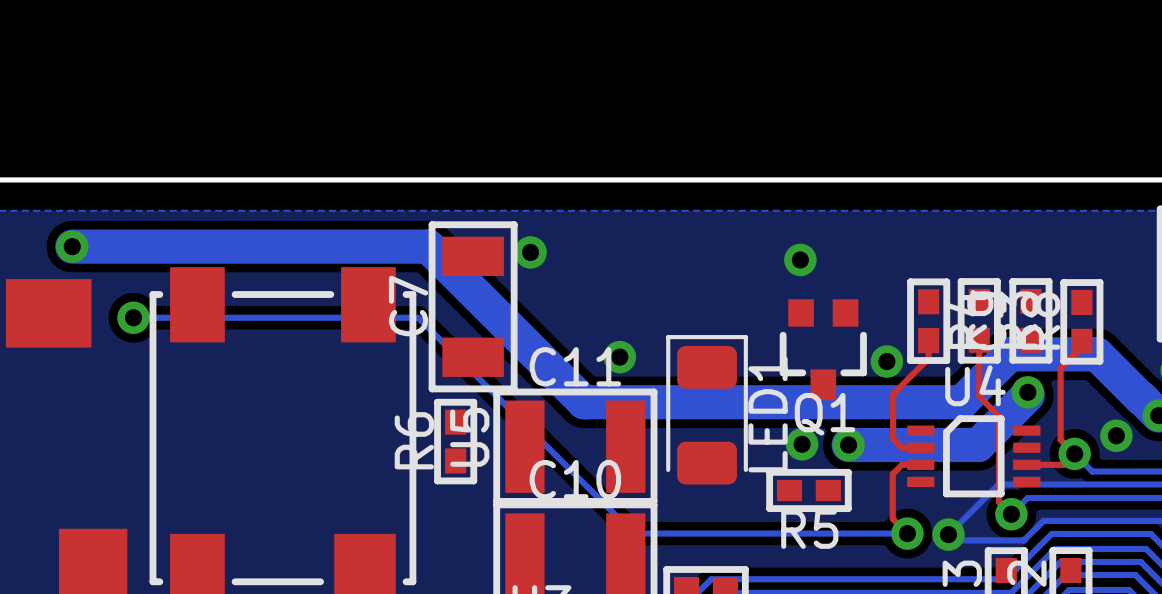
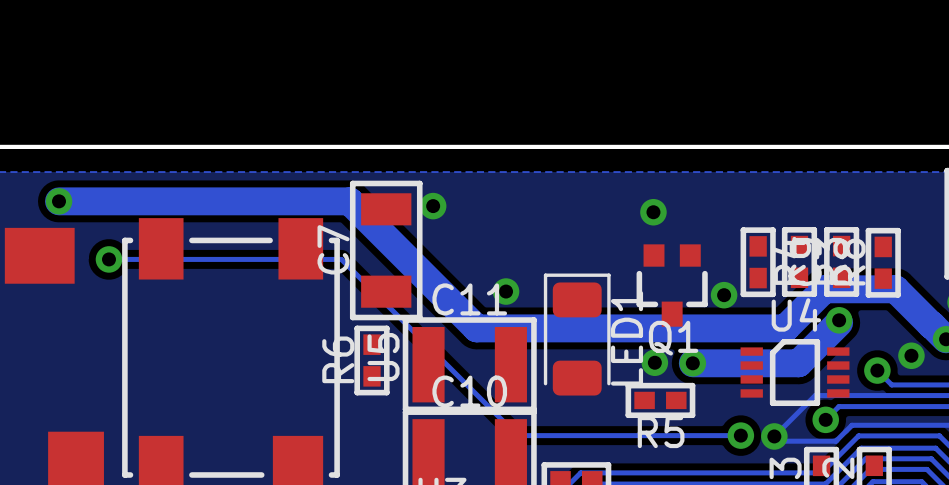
top track: (928, 340) (928, 358) (893, 394) (893, 438) (901, 447) (920, 447) -> none
top track: (979, 340) (979, 396) (999, 416) (999, 501) (1011, 514) -> none
top track: (1081, 341) (1081, 347) (1060, 368) (1060, 439) (1074, 453) (1063, 464) (1026, 464) -> none
top track: (920, 464) (901, 464) (892, 474) (892, 518) (907, 533) -> none

